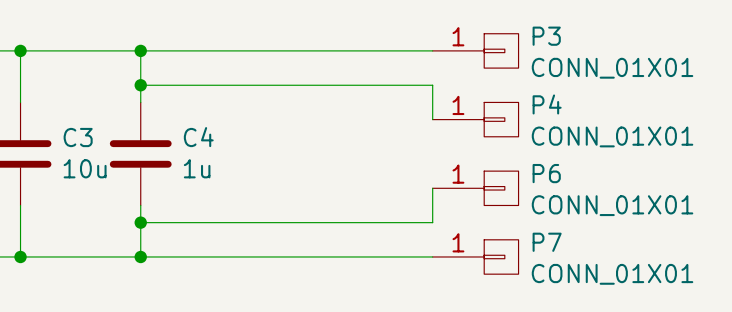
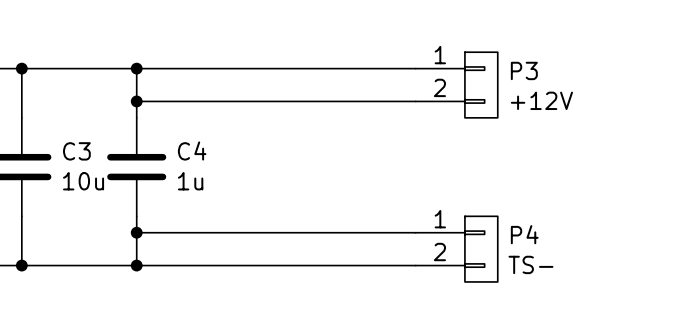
P3 symbol: [432, 33, 519, 69] -> [415, 52, 498, 118]
P3 value: CONN_01X01 (612, 68) -> +12V (541, 100)
wire: (432, 85) (432, 119) -> none
P4 symbol: [432, 102, 519, 137] -> [415, 216, 498, 282]
P4 value: CONN_01X01 (612, 136) -> TS- (530, 264)
wire: (432, 188) (432, 222) -> none
P6: CONN_01X01 (475, 188) -> none
P7: CONN_01X01 (475, 256) -> none

